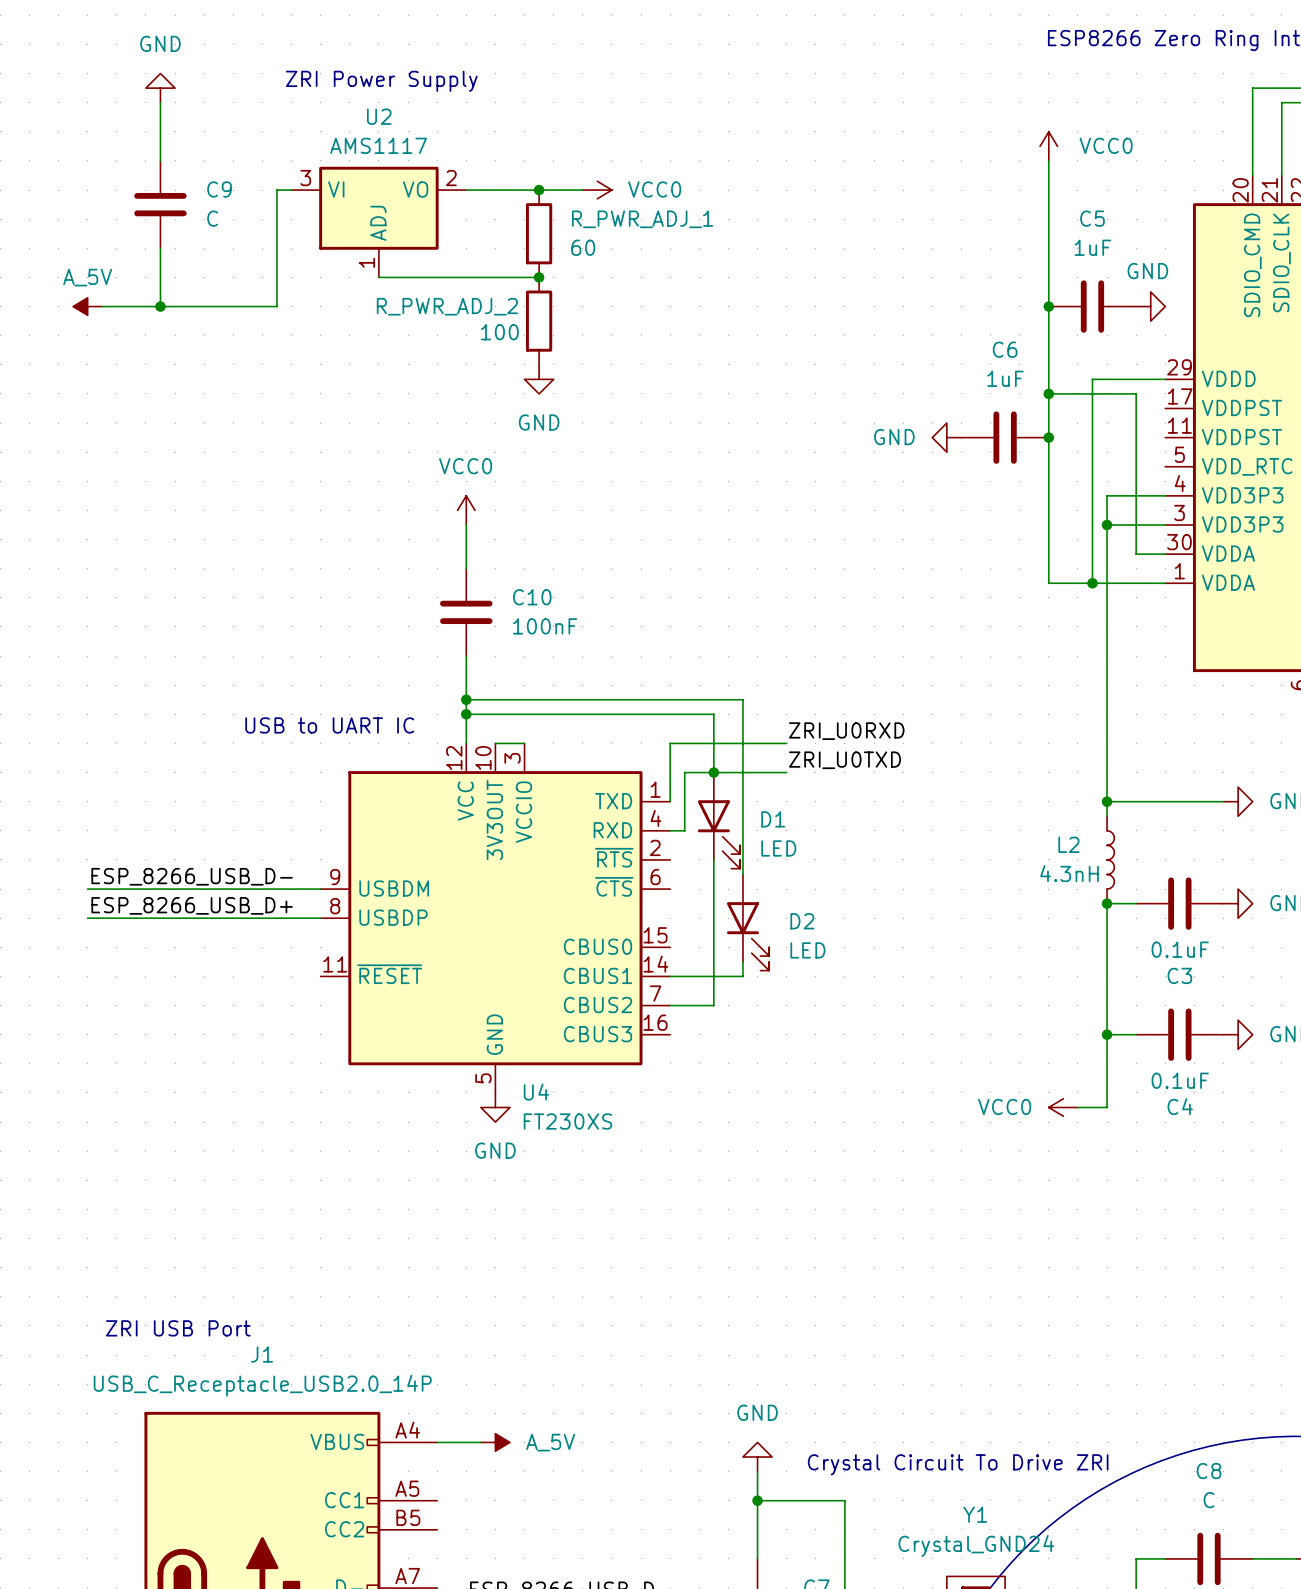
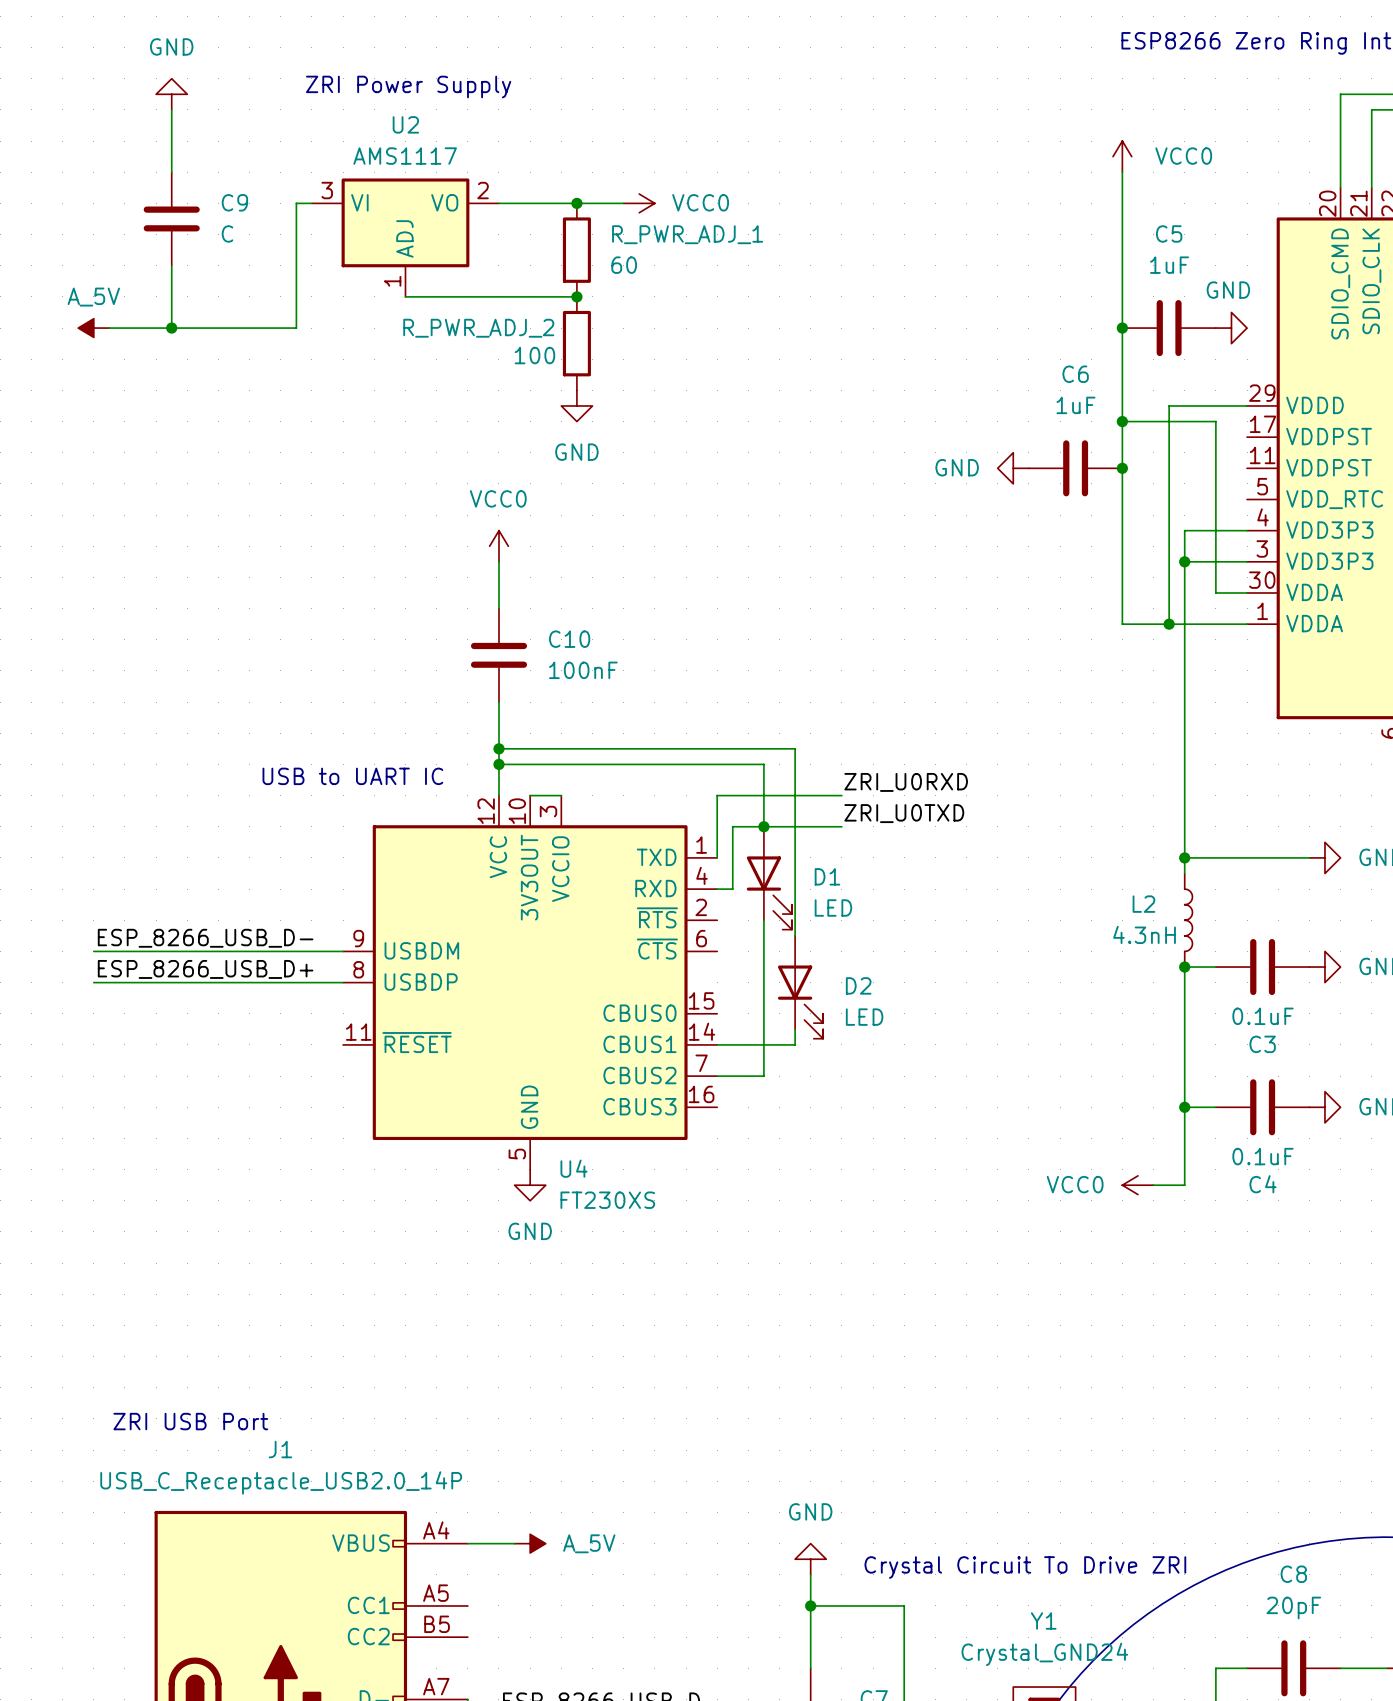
C8 value: C (1208, 1500) -> 20pF (1293, 1608)

